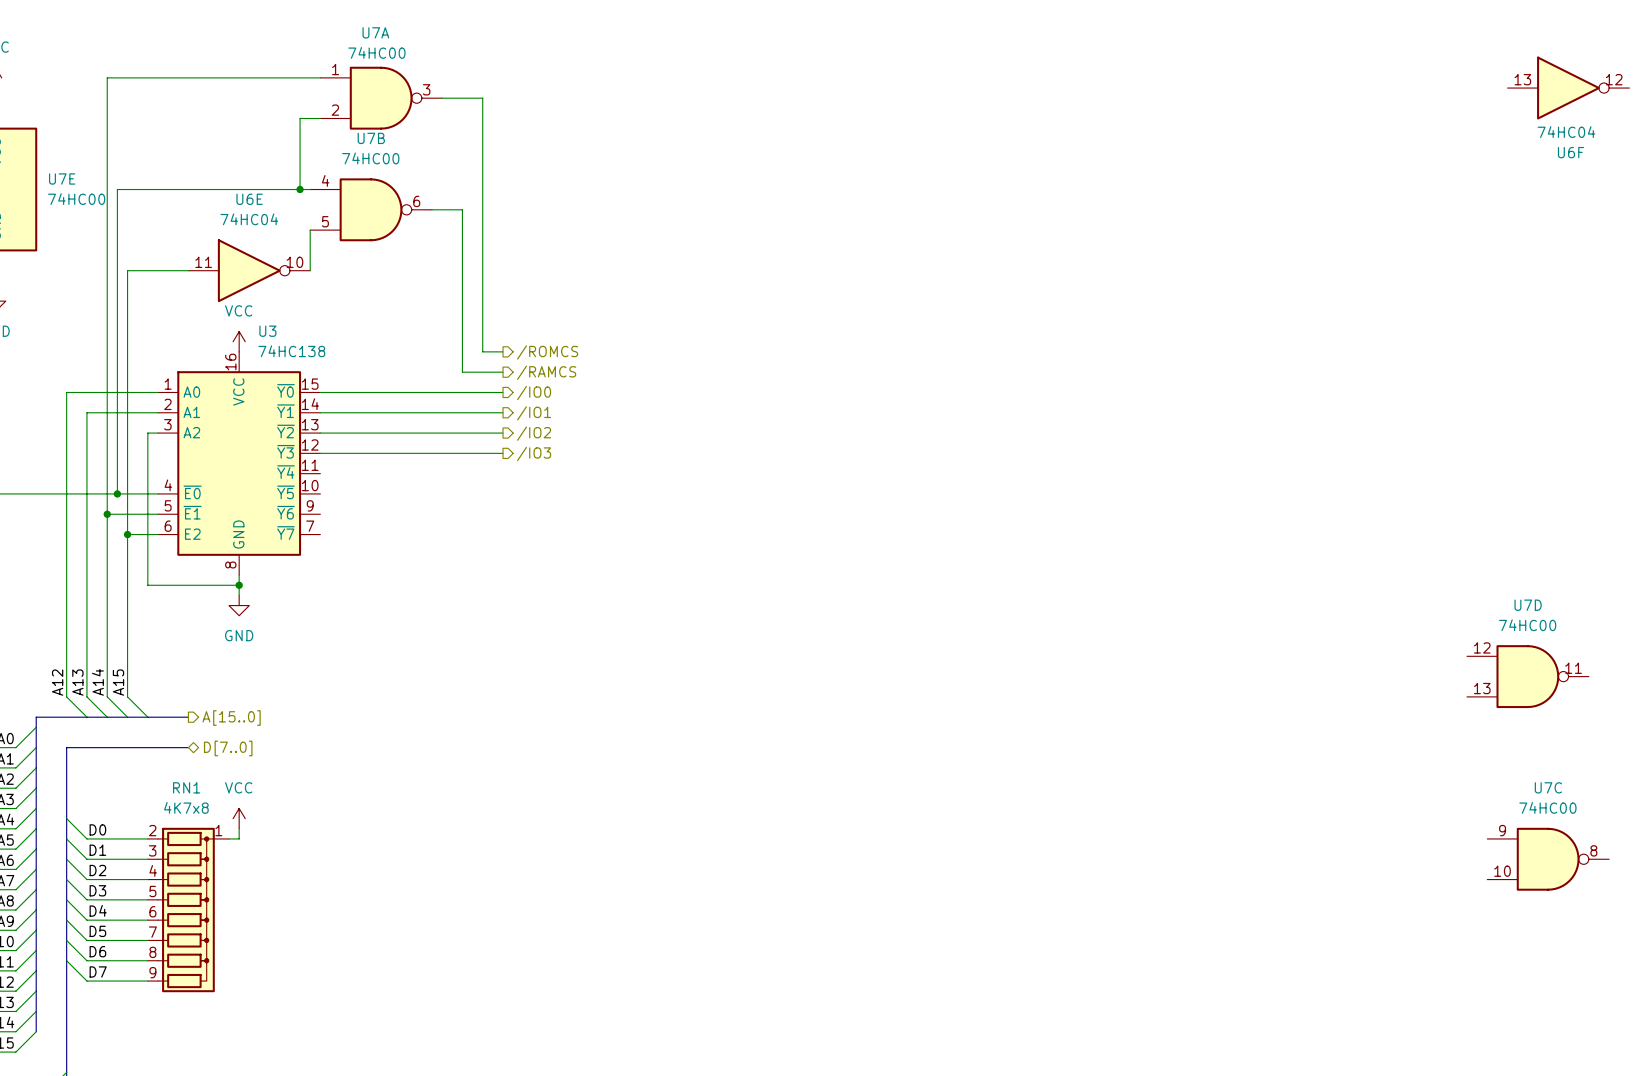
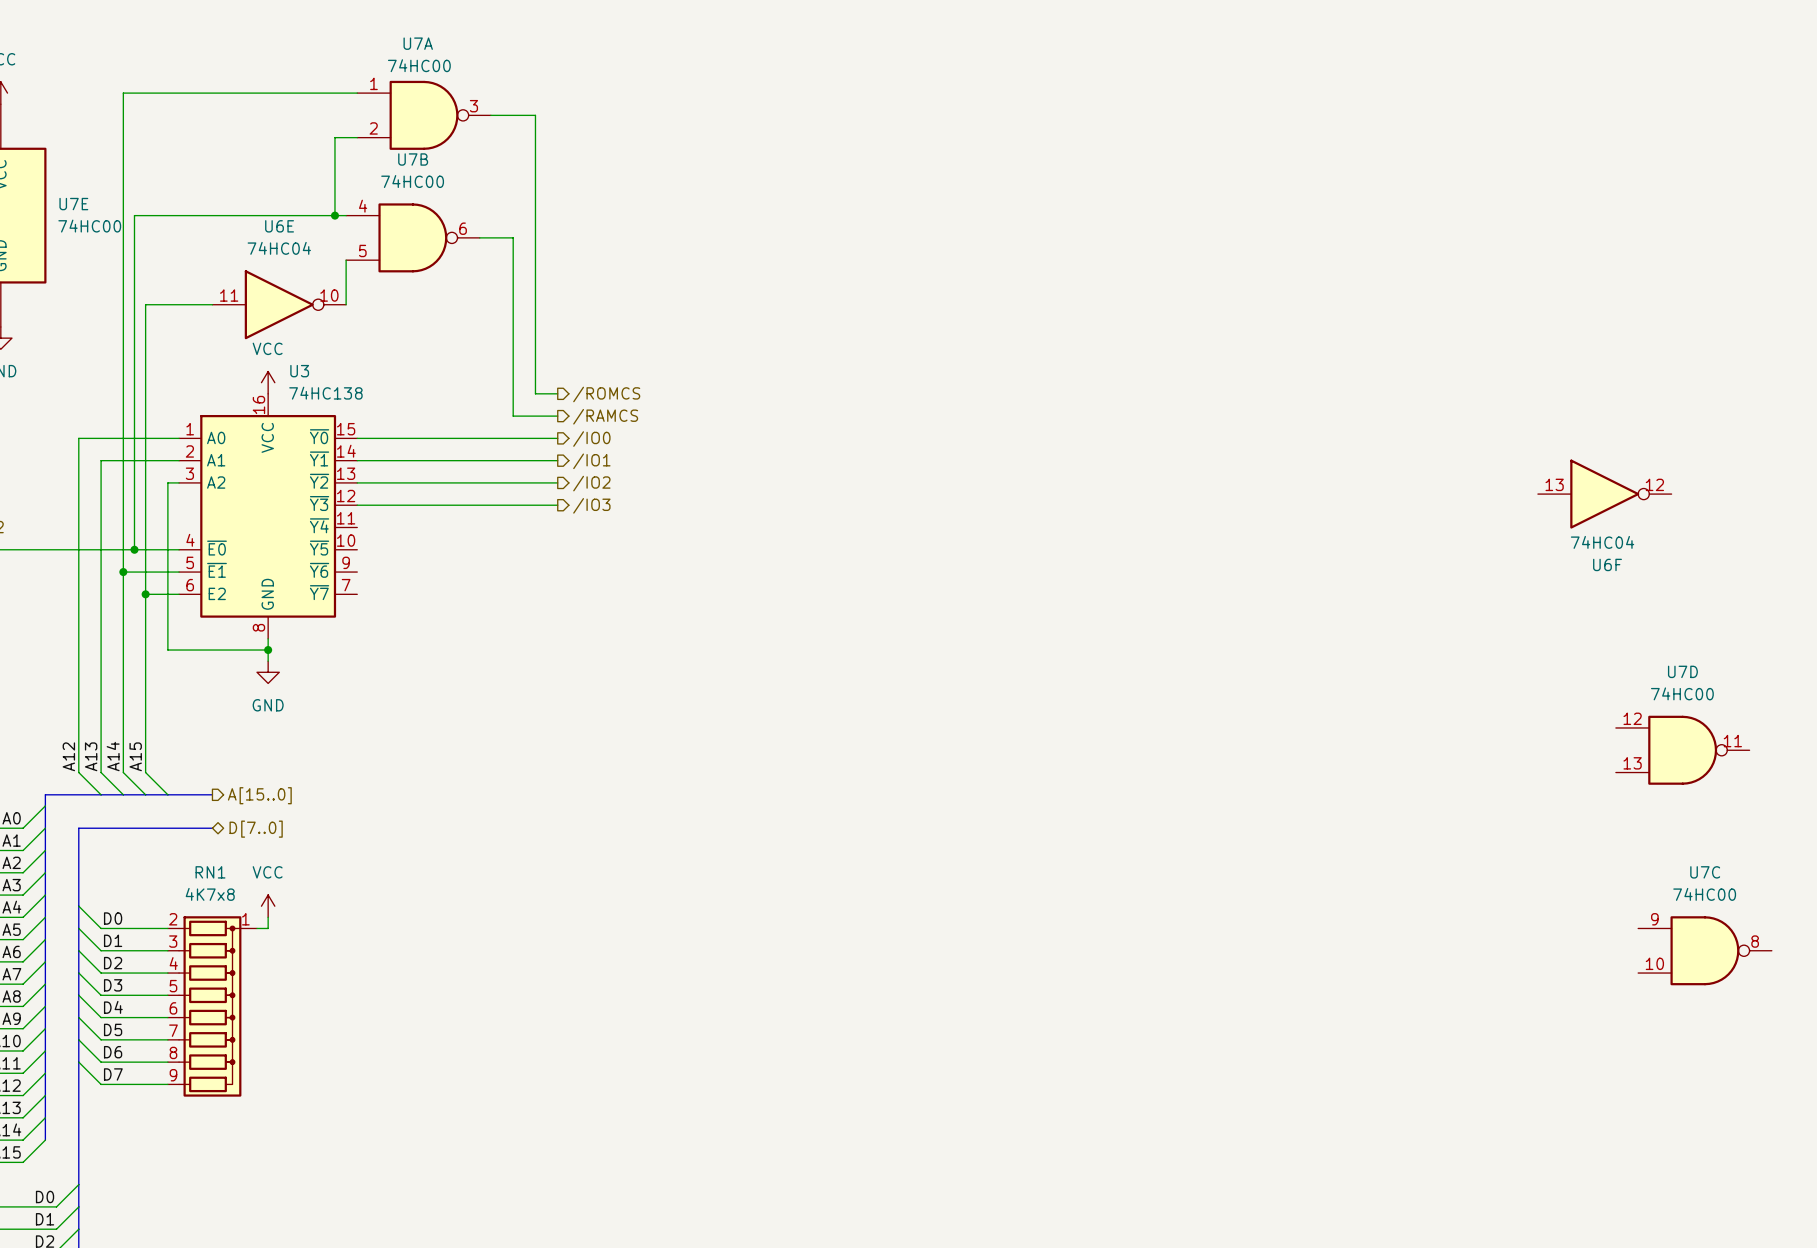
U6F position: (1568, 88) -> (1604, 494)

